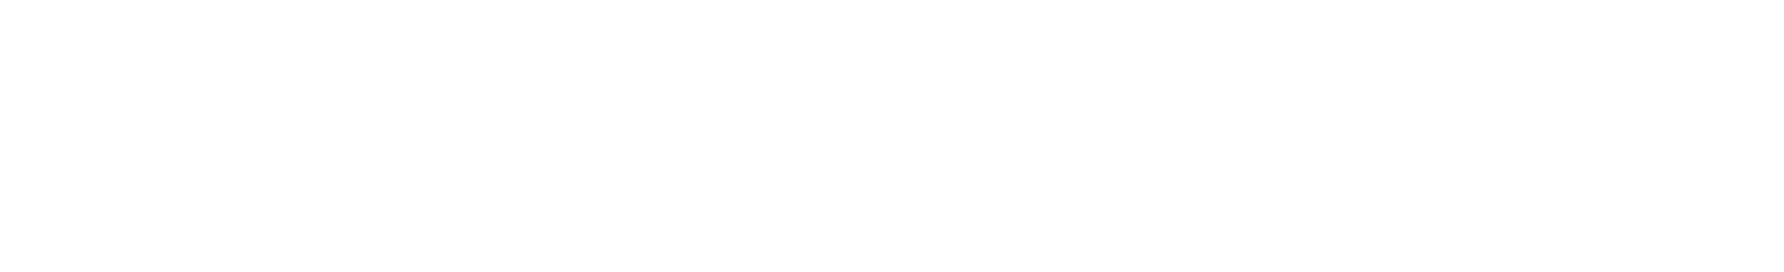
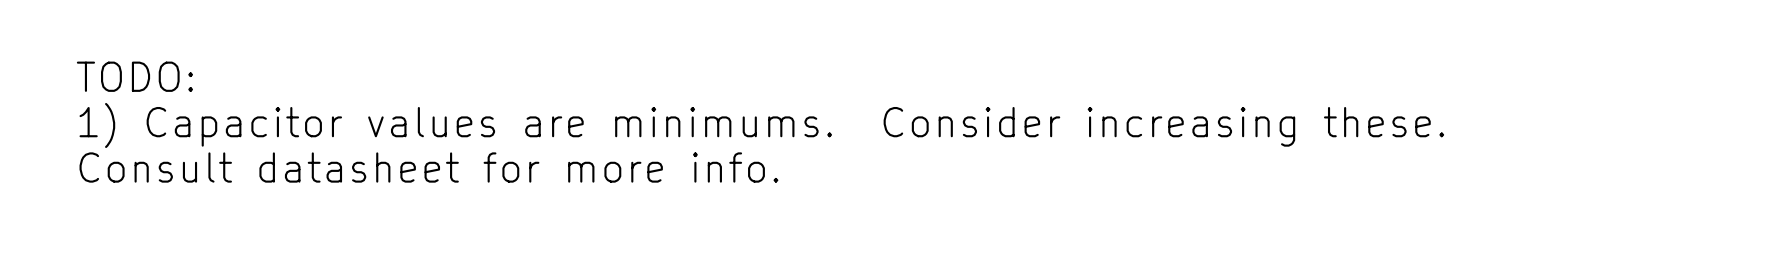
text: none -> TODO: (134, 76)
text: none -> 1) Capacitor values are minimums. Consider increasing these. (761, 125)
text: none -> Consult datasheet for more info. (428, 167)

